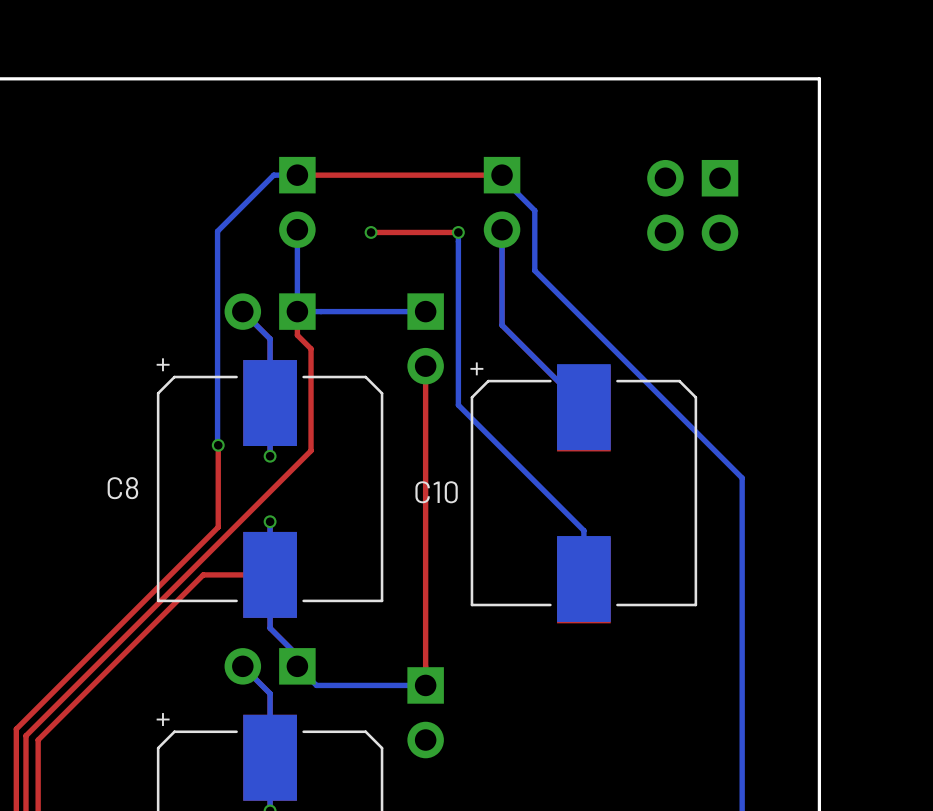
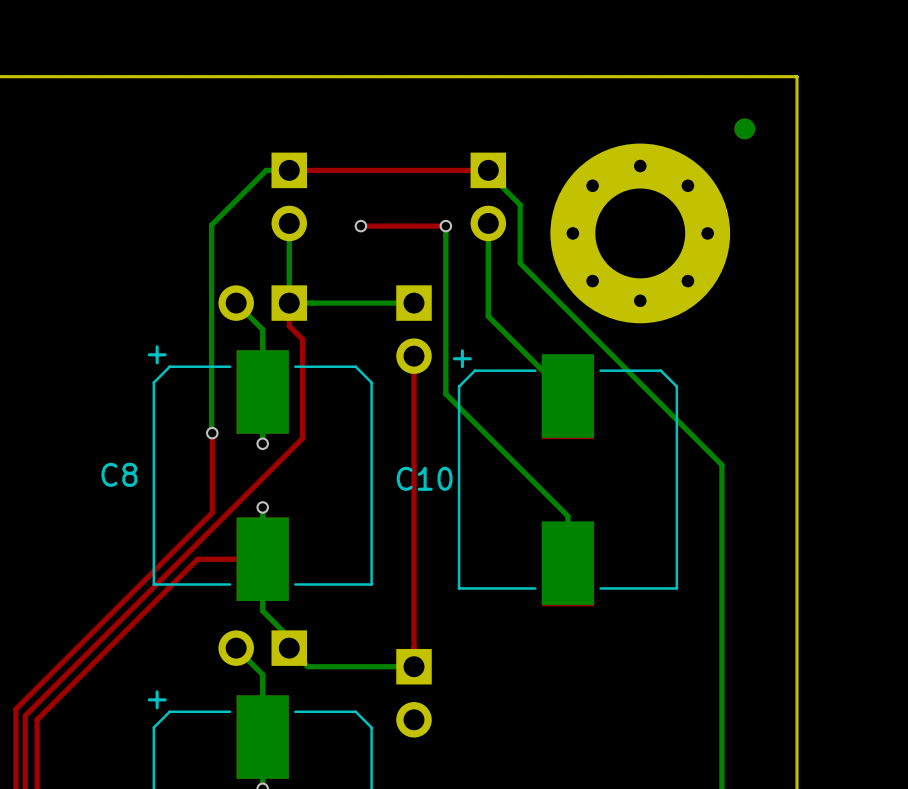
part: none -> (744, 128)
part: (692, 205) -> none
part: none -> (640, 233)

